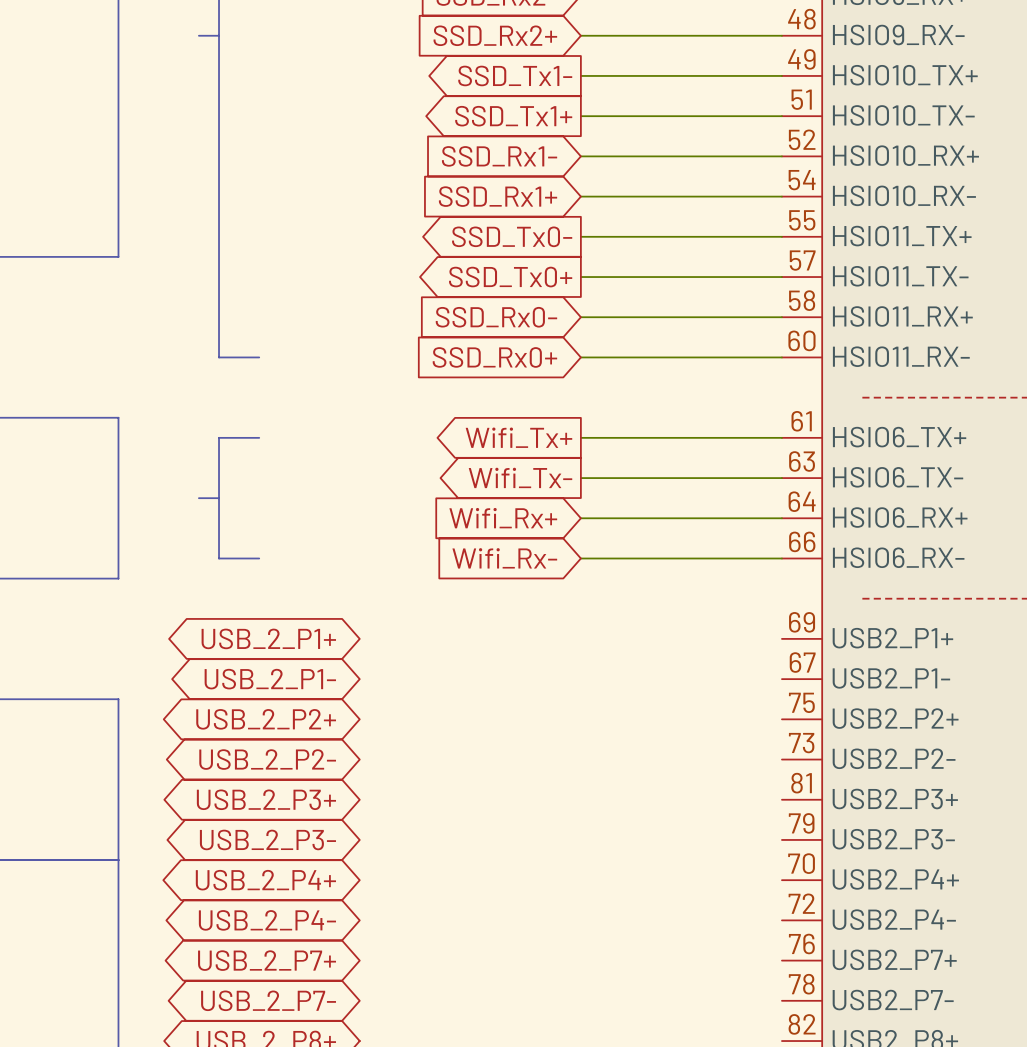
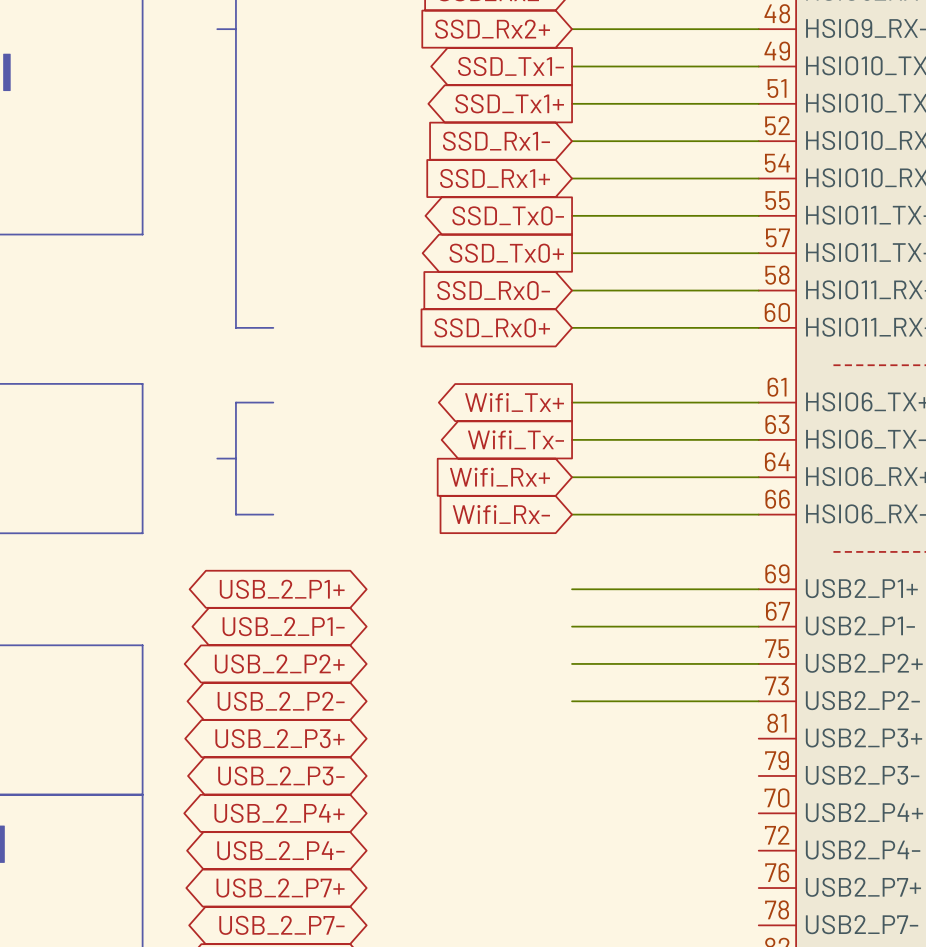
wire: none -> (572, 589) (758, 589)
wire: none -> (572, 626) (758, 626)
wire: none -> (572, 663) (758, 663)
wire: none -> (572, 701) (758, 701)

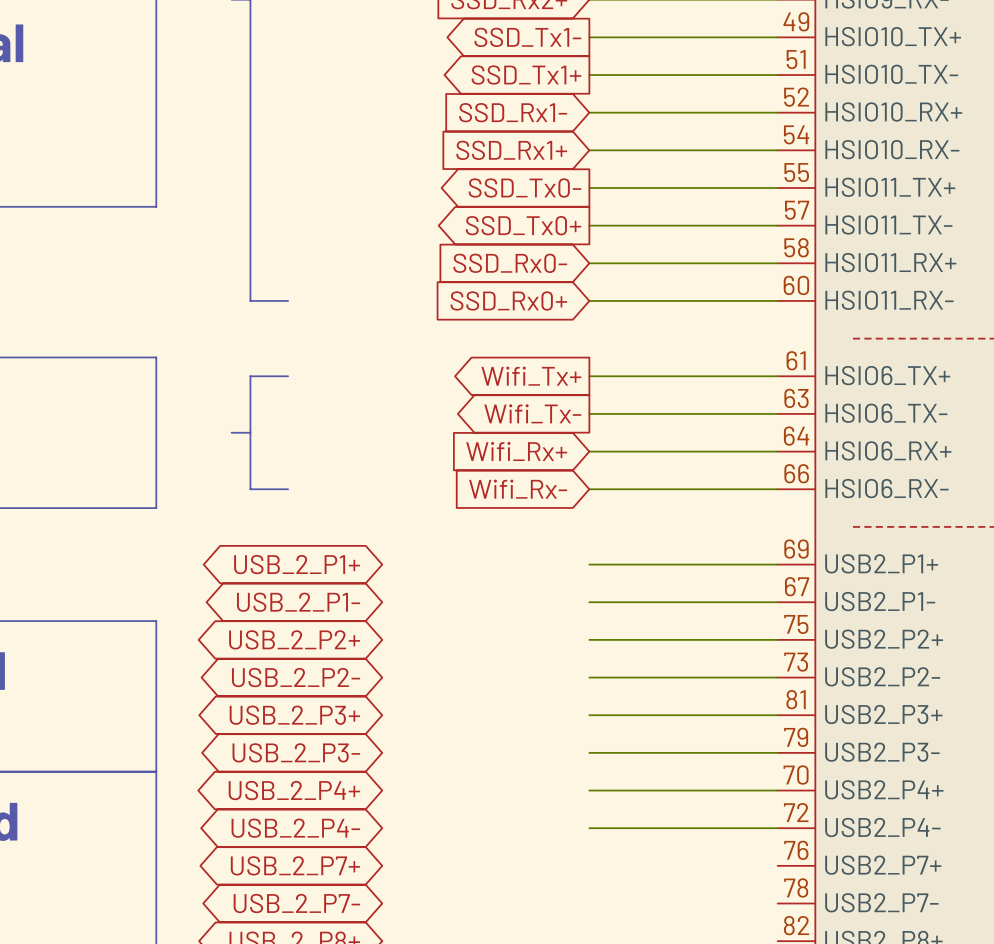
wire: none -> (589, 715) (777, 715)
wire: none -> (589, 752) (777, 752)
wire: none -> (589, 790) (777, 790)
wire: none -> (589, 828) (777, 828)

